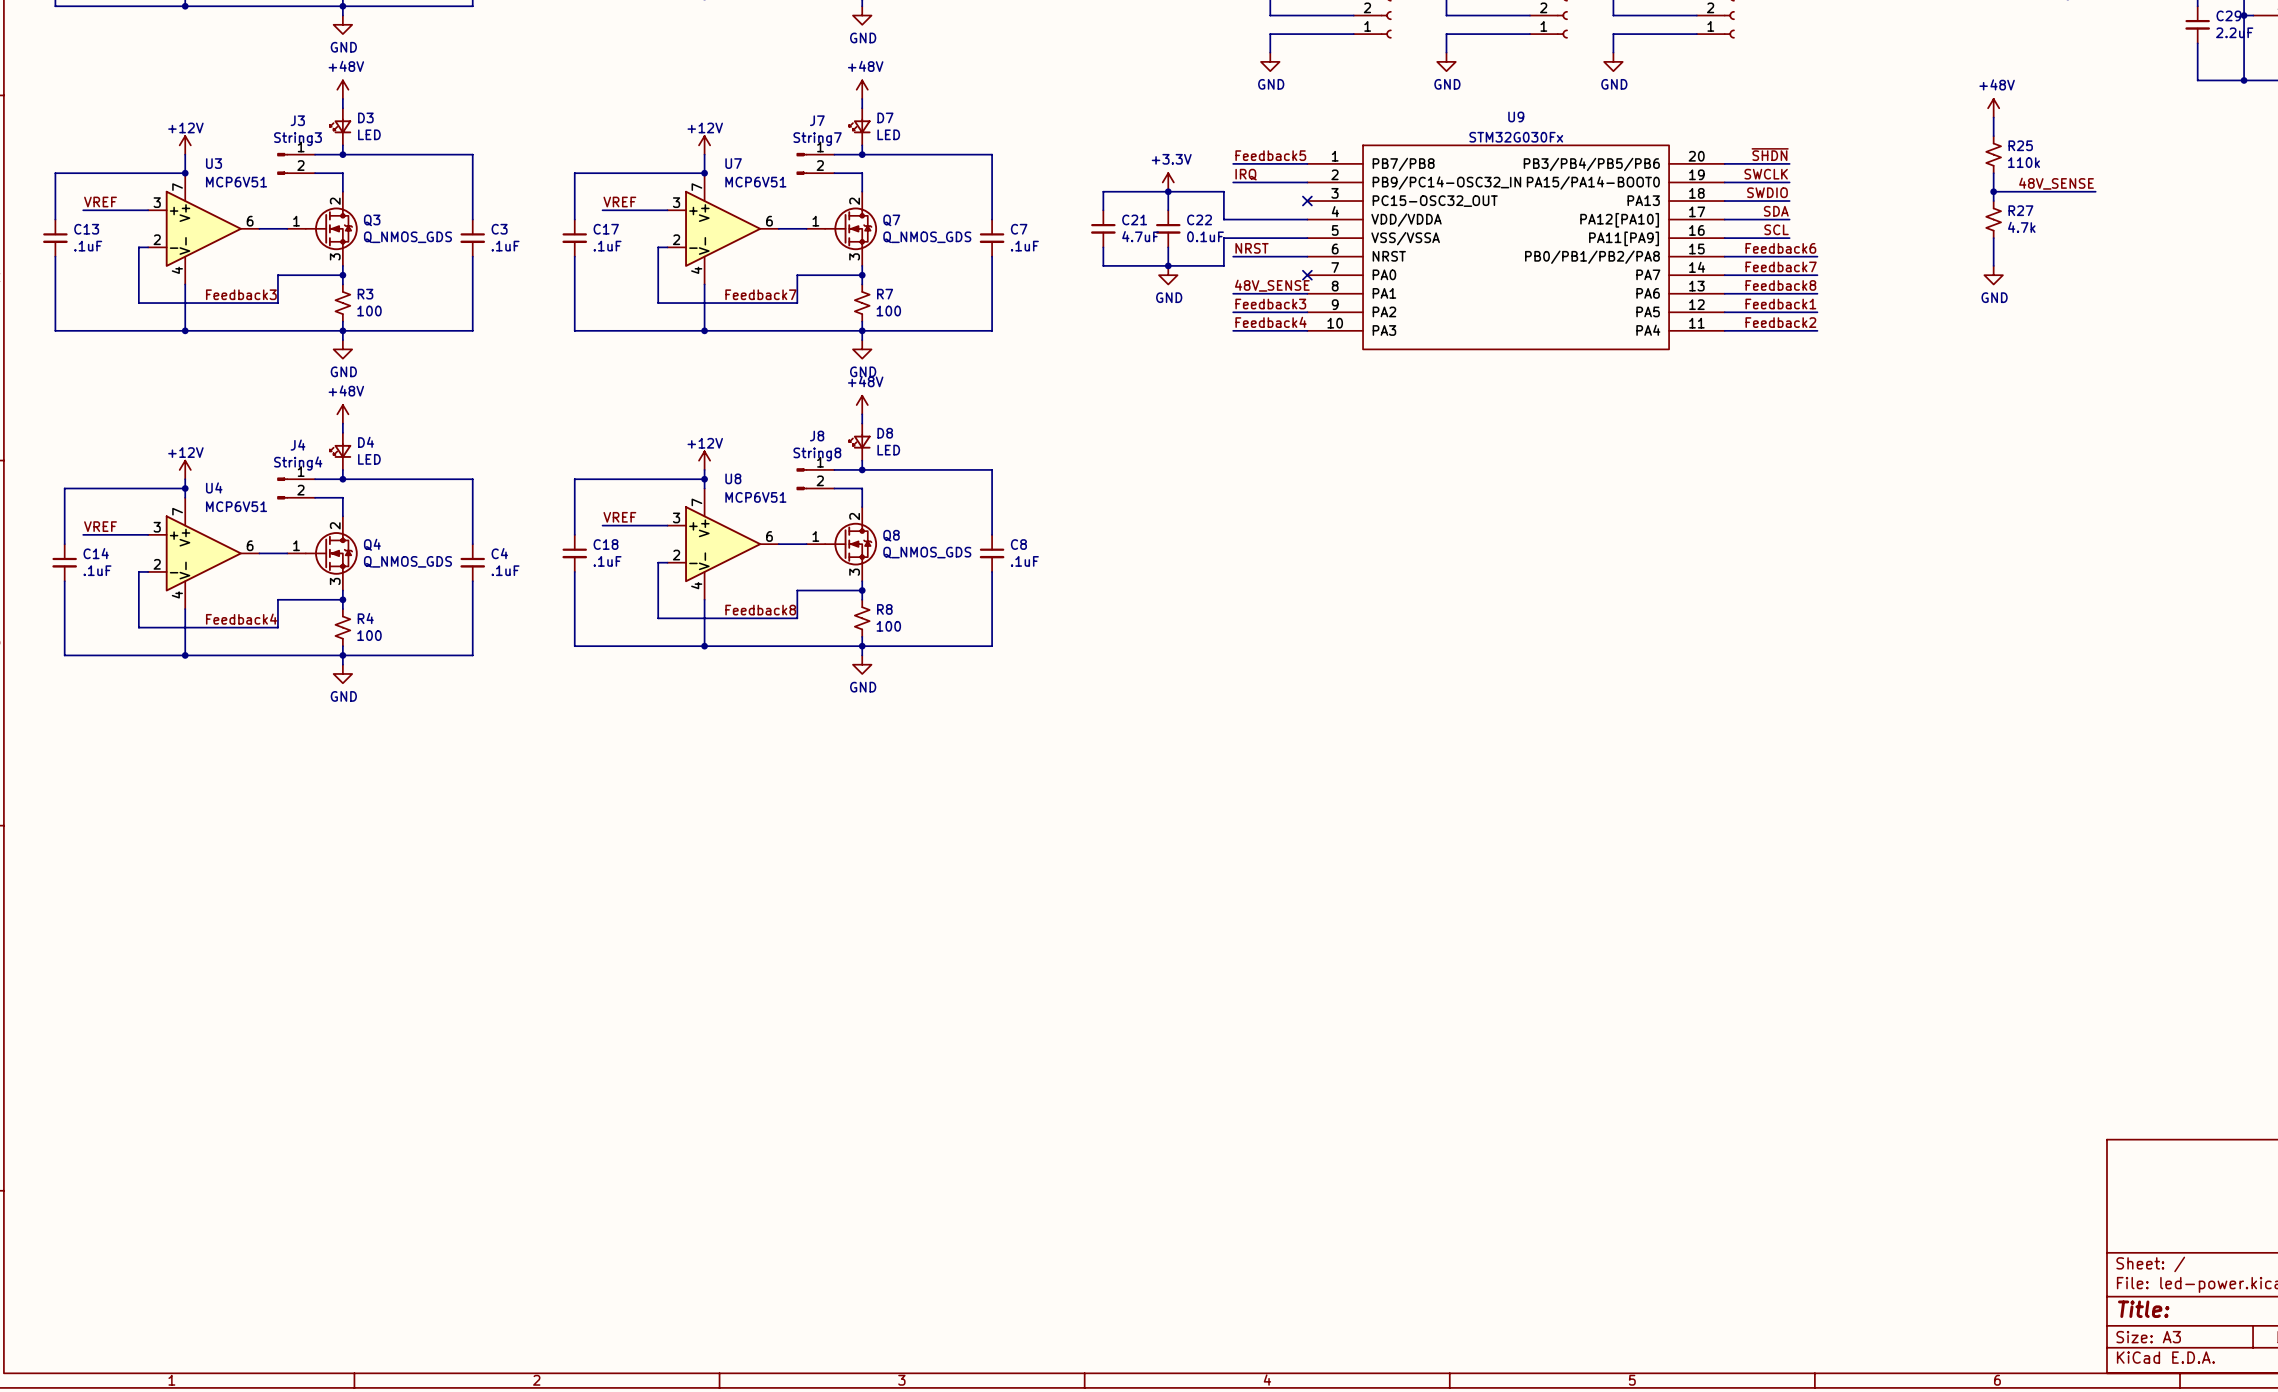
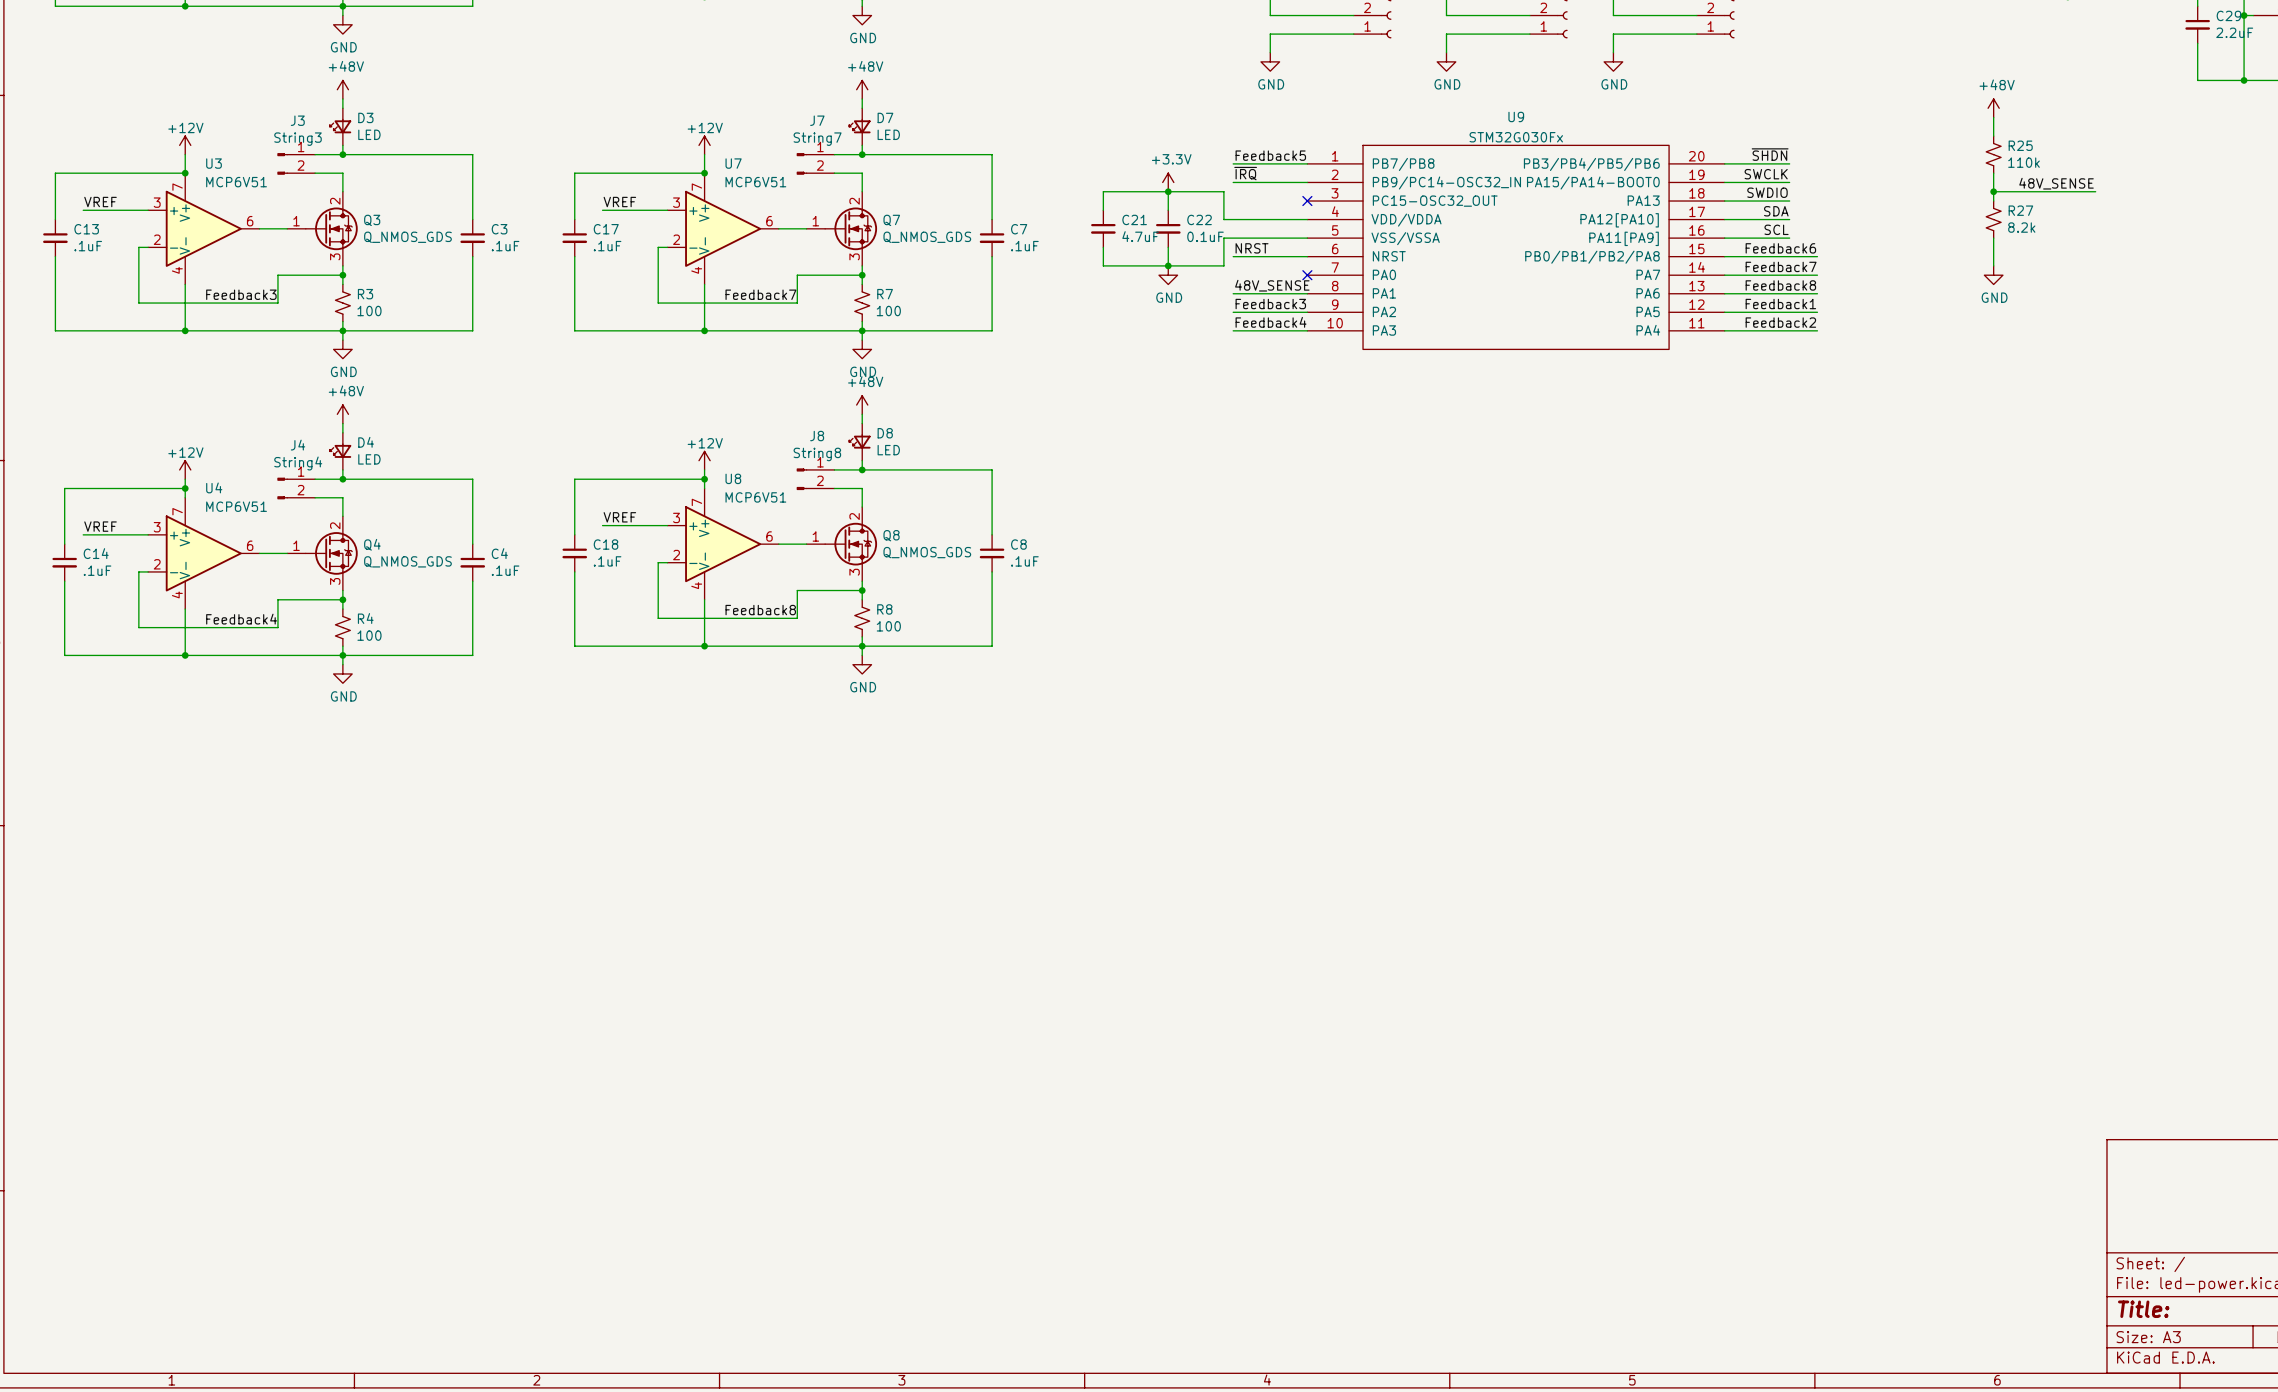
label: IRQ (1246, 174) -> ~{IRQ} (1245, 173)
R27 value: 4.7k (2021, 227) -> 8.2k (2021, 227)

